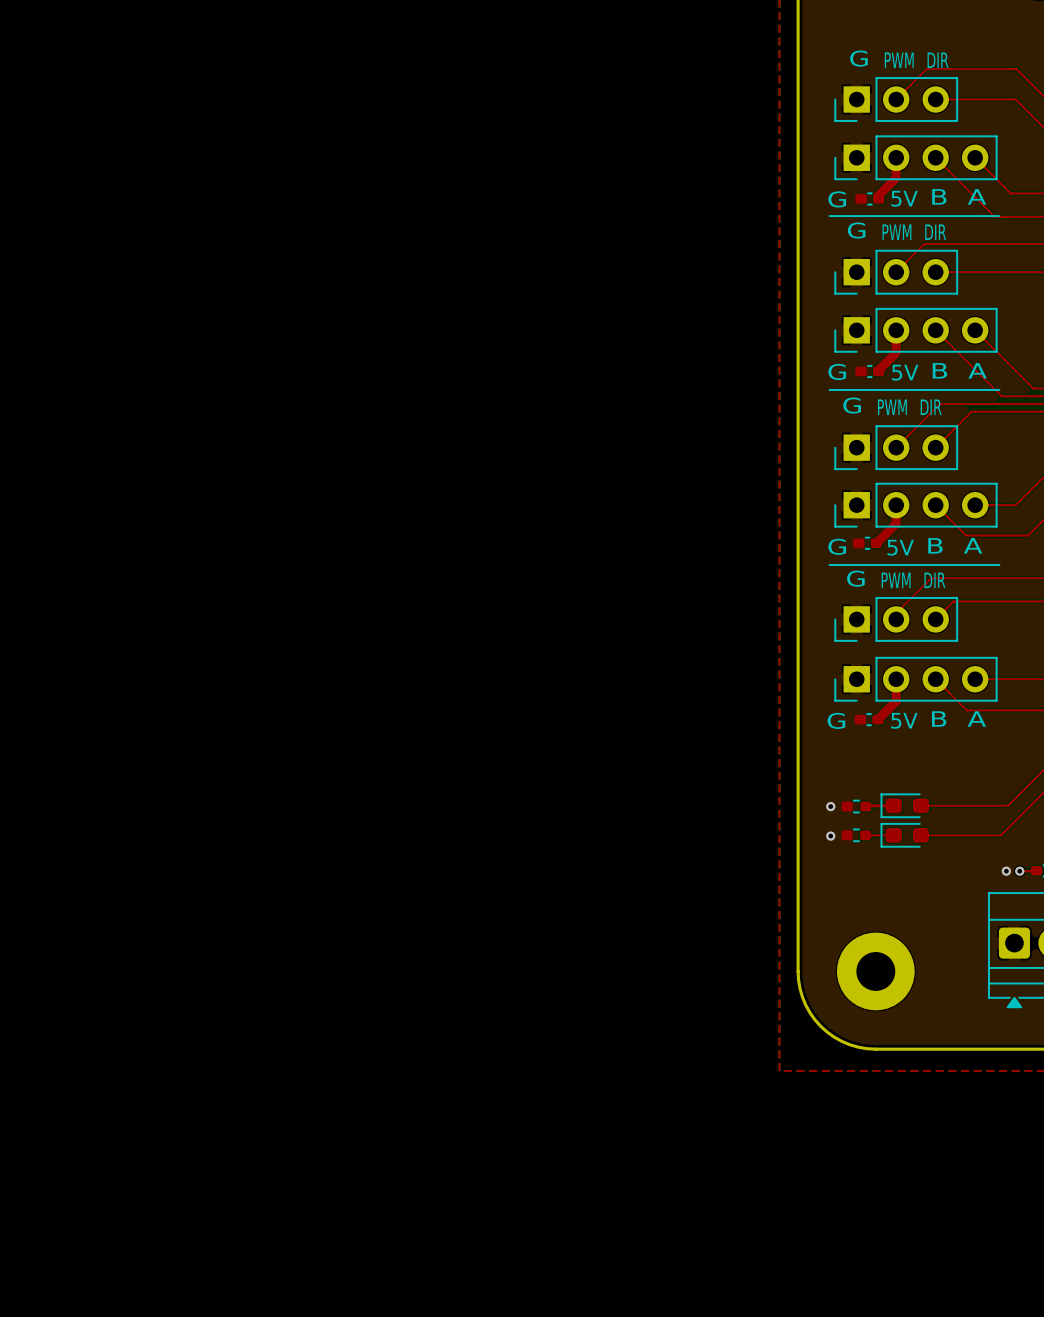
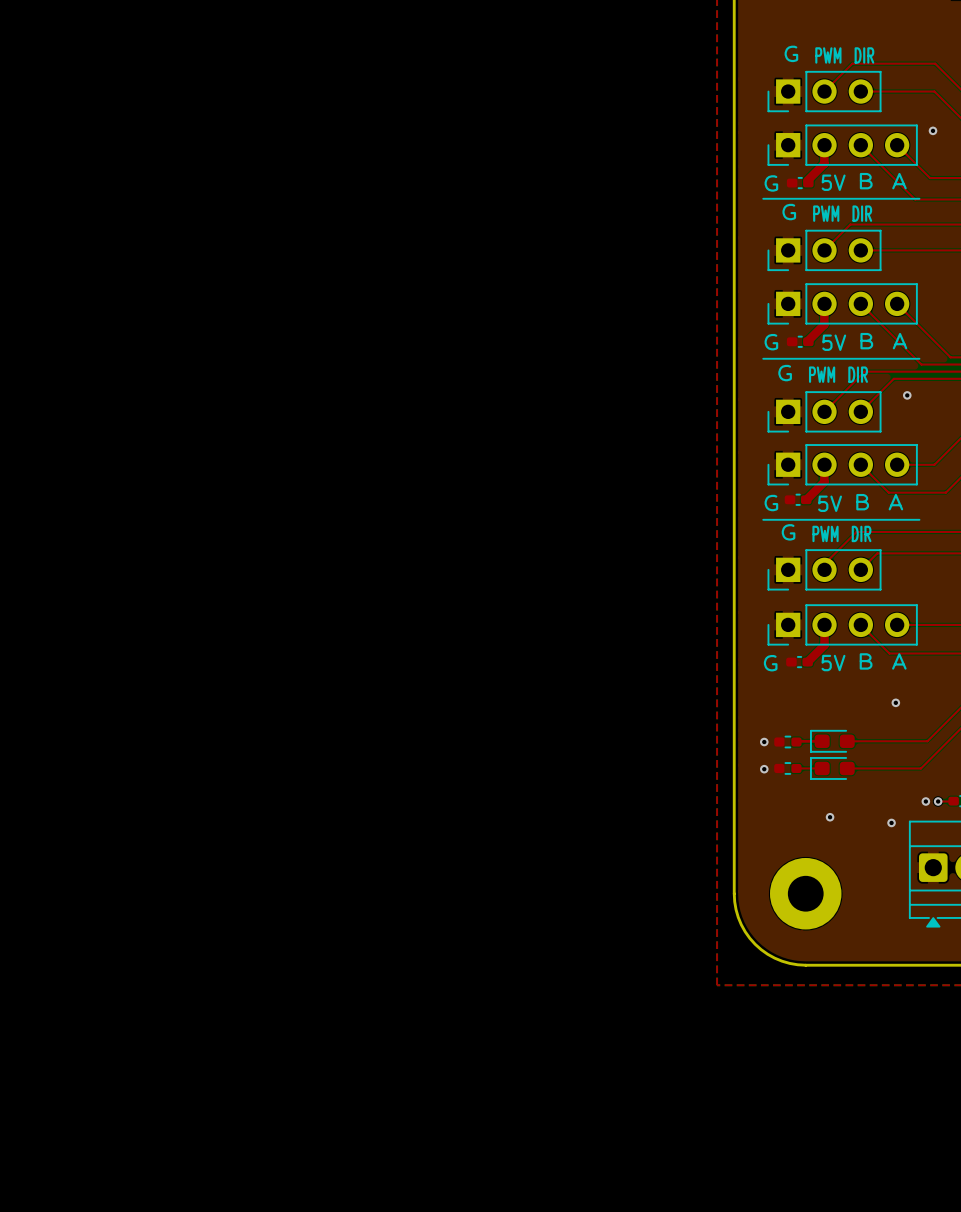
via: none -> (933, 130)
via: none -> (907, 395)
via: none -> (895, 702)
via: none -> (830, 817)
via: none -> (891, 822)

